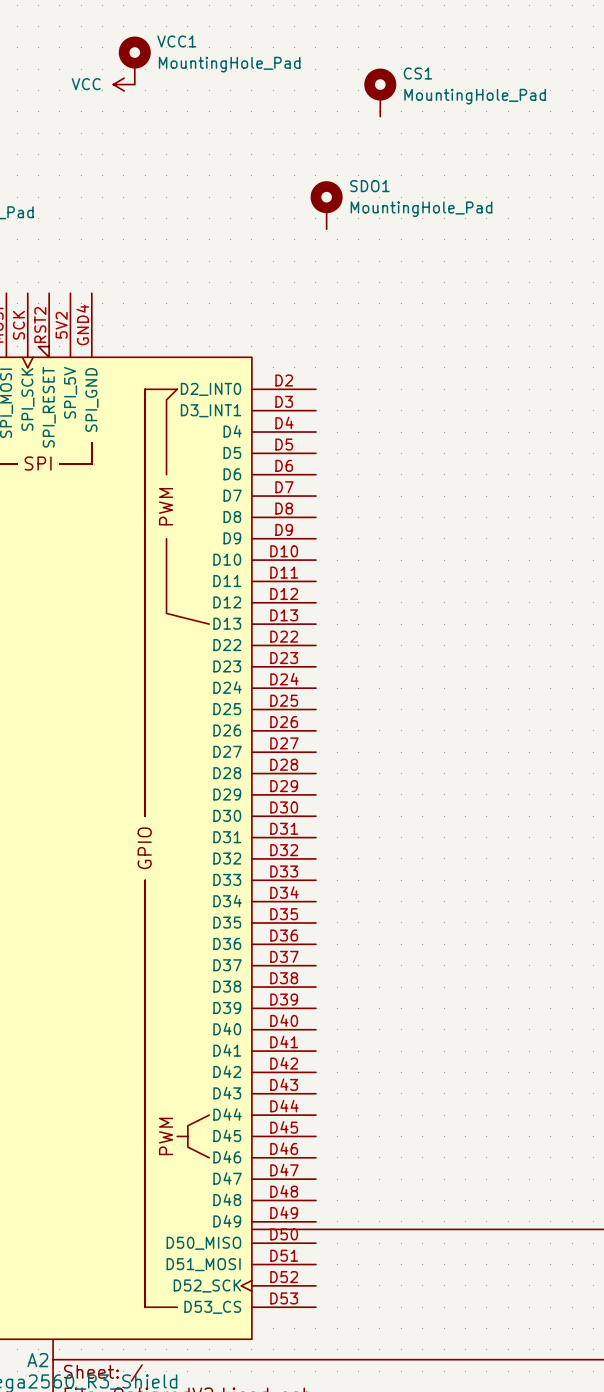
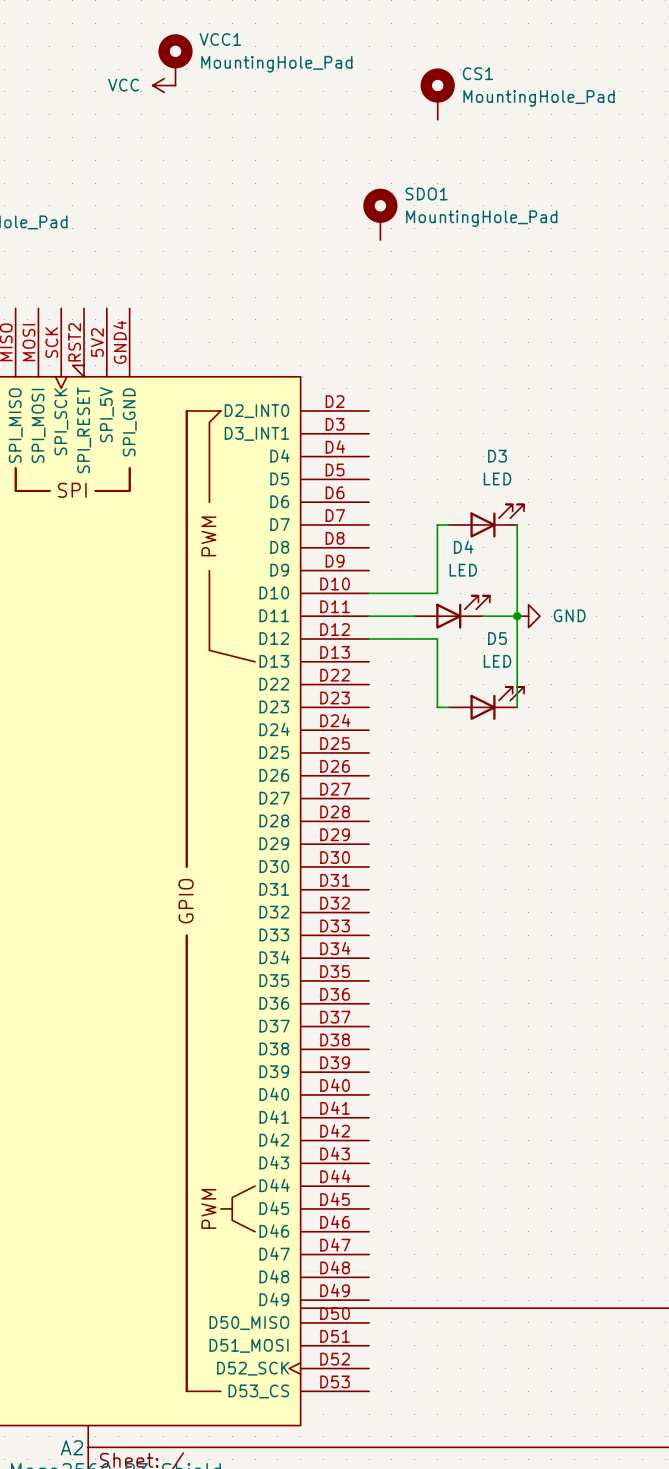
D3: none -> LED (486, 521)
wire: none -> (448, 524) (437, 524) (437, 593) (369, 593)
wire: none -> (517, 524) (517, 707)
D4: none -> LED (452, 612)
wire: none -> (369, 616) (414, 616)
wire: none -> (483, 616) (517, 616)
junction: none -> (517, 616)
power symbol: none -> GND (528, 616)
wire: none -> (369, 638) (437, 638) (437, 707) (448, 707)
D5: none -> LED (486, 703)

